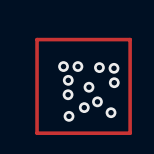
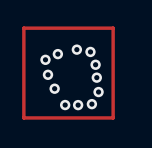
via: none -> (76, 49)
via: none -> (90, 51)
via: (63, 66) -> none
via: none -> (57, 54)
via: (77, 66) -> none
via: (99, 67) -> none
via: (113, 68) -> none
via: none -> (45, 59)
via: none -> (95, 64)
via: (68, 80) -> none
via: (114, 82) -> none
via: (88, 87) -> none
via: none -> (47, 74)
via: none -> (96, 77)
via: (68, 94) -> none
via: (97, 101) -> none
via: none -> (54, 88)
via: none -> (98, 92)
via: (84, 107) -> none
via: (111, 112) -> none
via: (69, 116) -> none
via: none -> (91, 104)
via: none -> (65, 105)
via: none -> (78, 105)

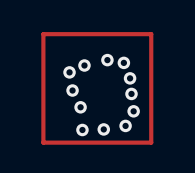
via: (65, 105) -> none
via: (78, 105) -> none
via: none -> (82, 129)
via: none -> (103, 129)

